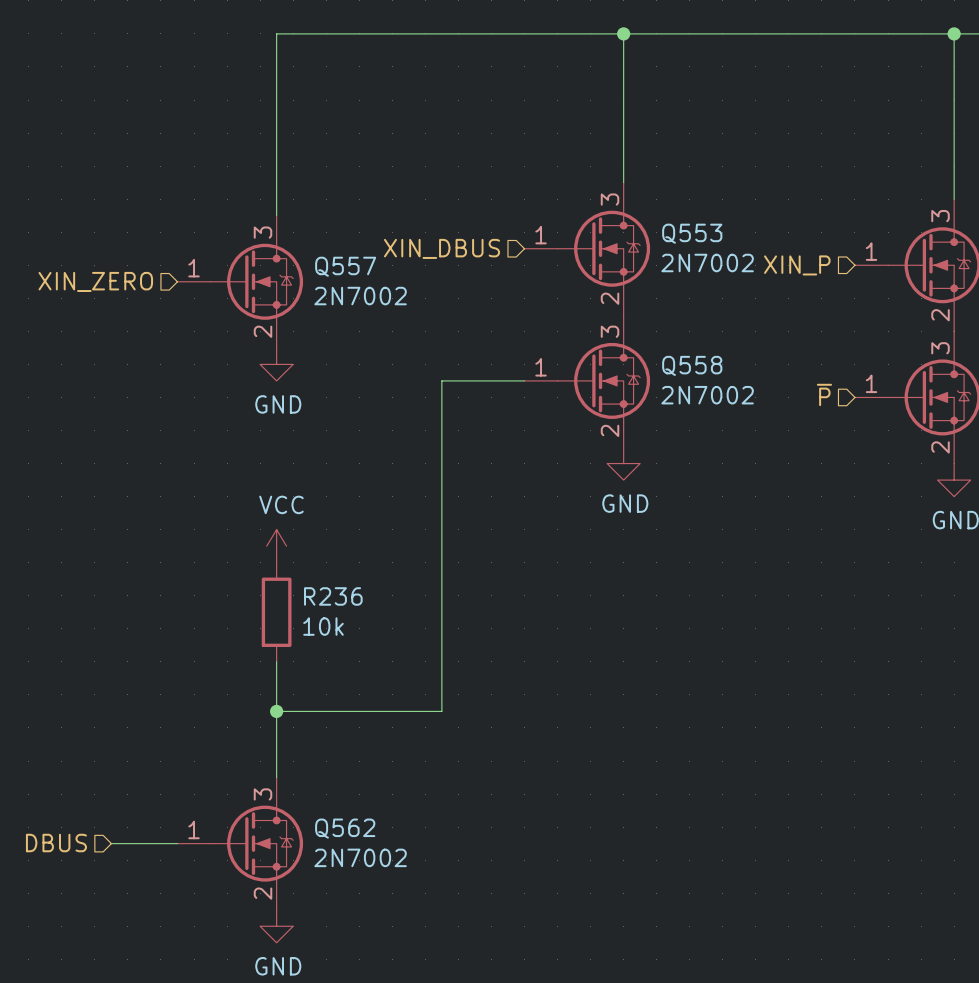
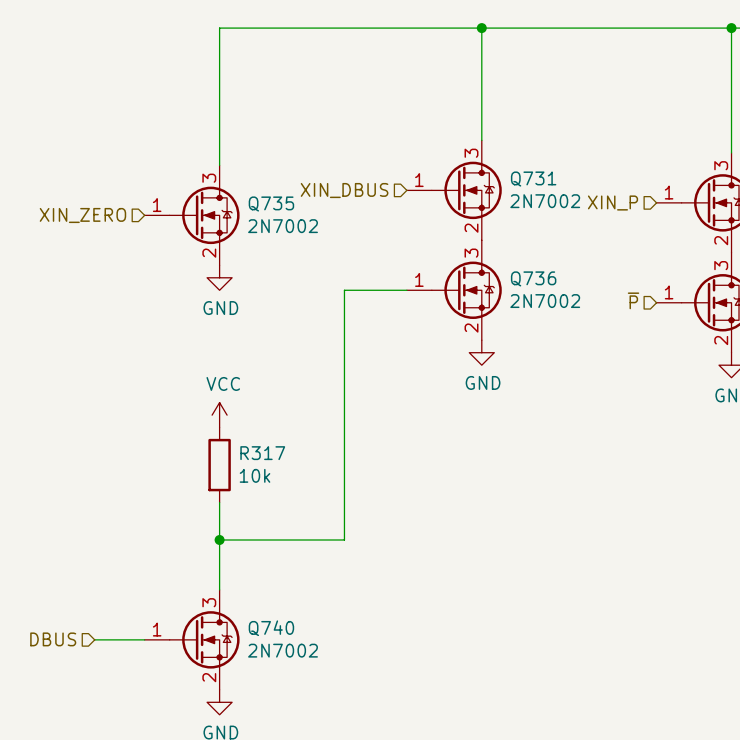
Q553 name: Q553 (692, 233) -> Q731 (533, 179)
Q557 name: Q557 (345, 266) -> Q735 (271, 204)
Q558 name: Q558 (692, 365) -> Q736 (533, 278)
R236 name: R236 (333, 596) -> R317 (262, 453)
Q562 name: Q562 (345, 828) -> Q740 (271, 628)

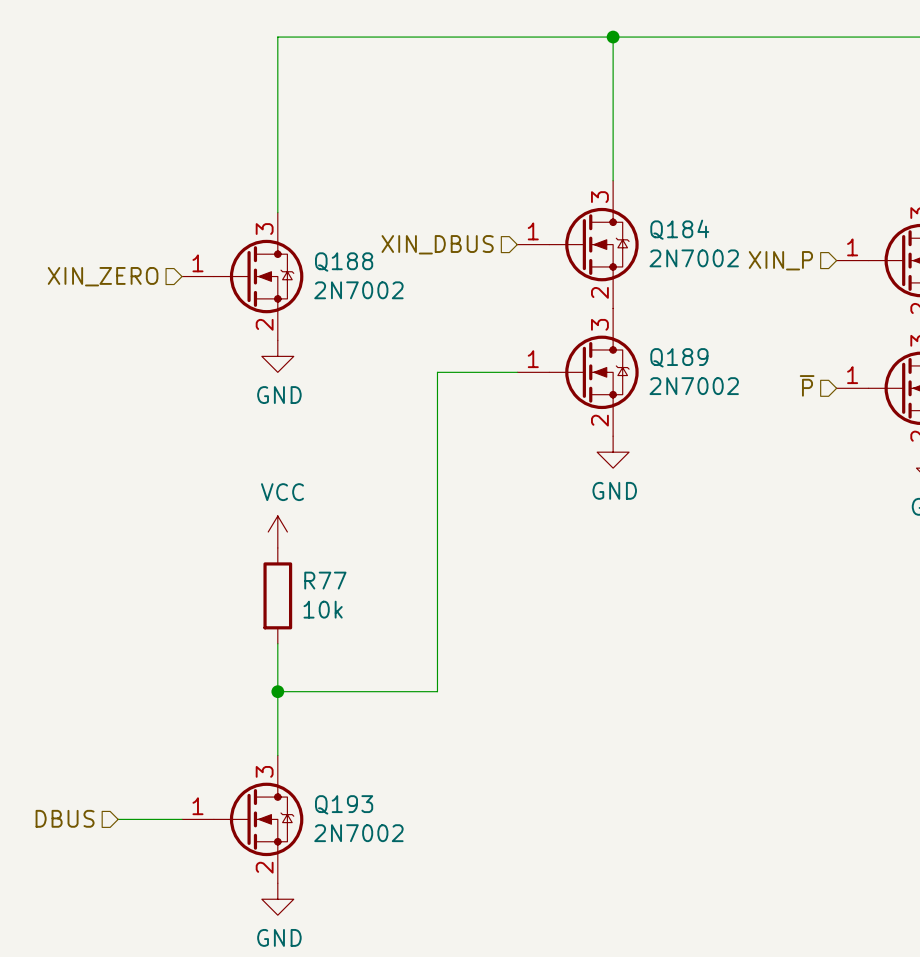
Q731 name: Q731 (533, 179) -> Q184 (679, 229)
Q735 name: Q735 (271, 204) -> Q188 (344, 262)
Q736 name: Q736 (533, 278) -> Q189 (679, 357)
R317 name: R317 (262, 453) -> R77 (325, 580)
Q740 name: Q740 (271, 628) -> Q193 (344, 804)

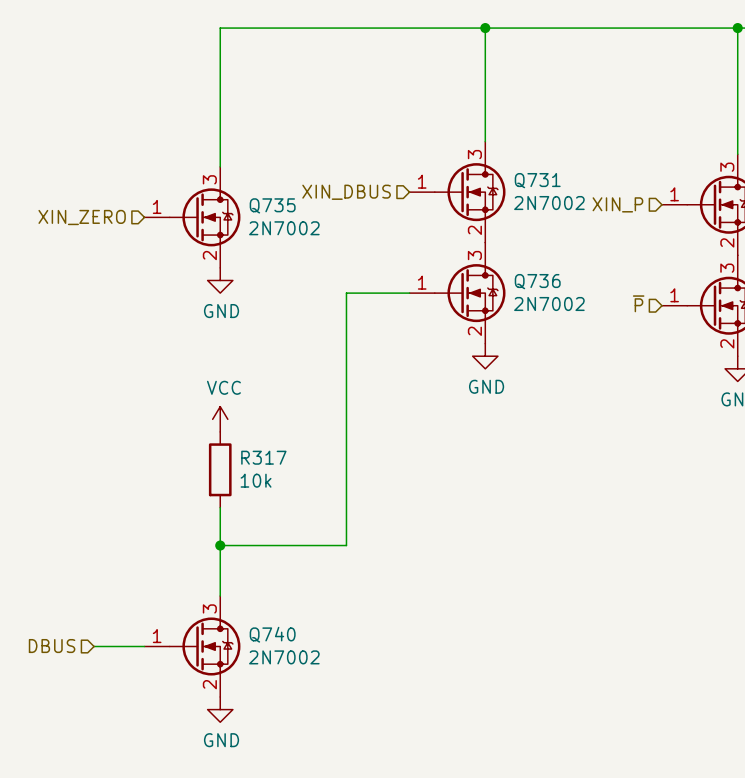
Q184 name: Q184 (679, 229) -> Q731 (537, 180)
Q188 name: Q188 (344, 262) -> Q735 (272, 205)
Q189 name: Q189 (679, 357) -> Q736 (537, 281)
R77 name: R77 (325, 580) -> R317 (263, 457)
Q193 name: Q193 (344, 804) -> Q740 (272, 634)

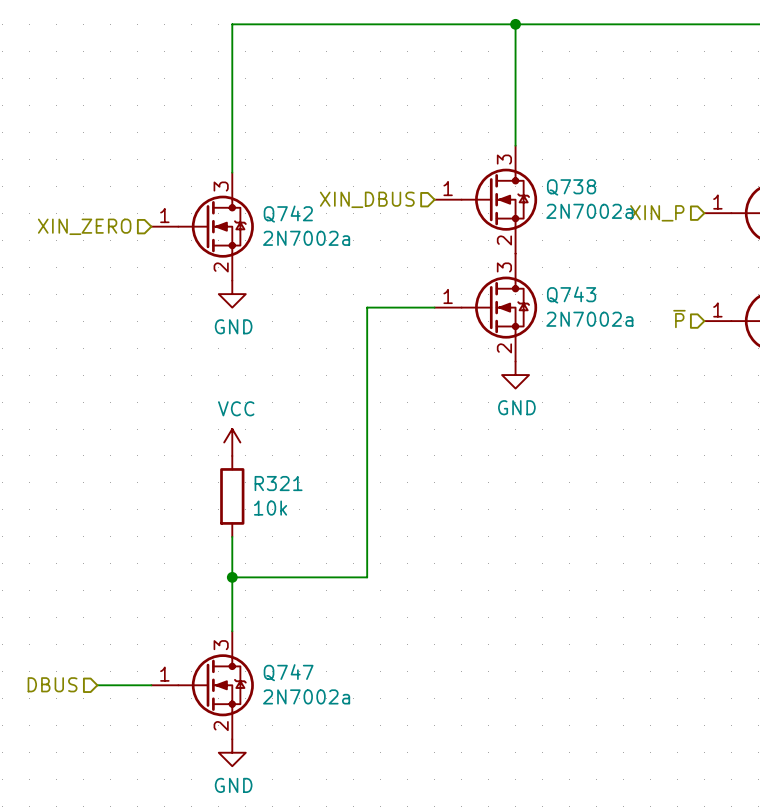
Q731 name: Q731 (537, 180) -> Q738 (571, 187)
Q731 value: 2N7002 (549, 203) -> 2N7002a (589, 211)
Q735 name: Q735 (272, 205) -> Q742 (288, 214)
Q735 value: 2N7002 (284, 228) -> 2N7002a (306, 238)
Q736 name: Q736 (537, 281) -> Q743 (571, 295)
Q736 value: 2N7002 (549, 303) -> 2N7002a (589, 319)
R317 name: R317 (263, 457) -> R321 (278, 483)
Q740 name: Q740 (272, 634) -> Q747 (288, 672)
Q740 value: 2N7002 (284, 657) -> 2N7002a (306, 696)

